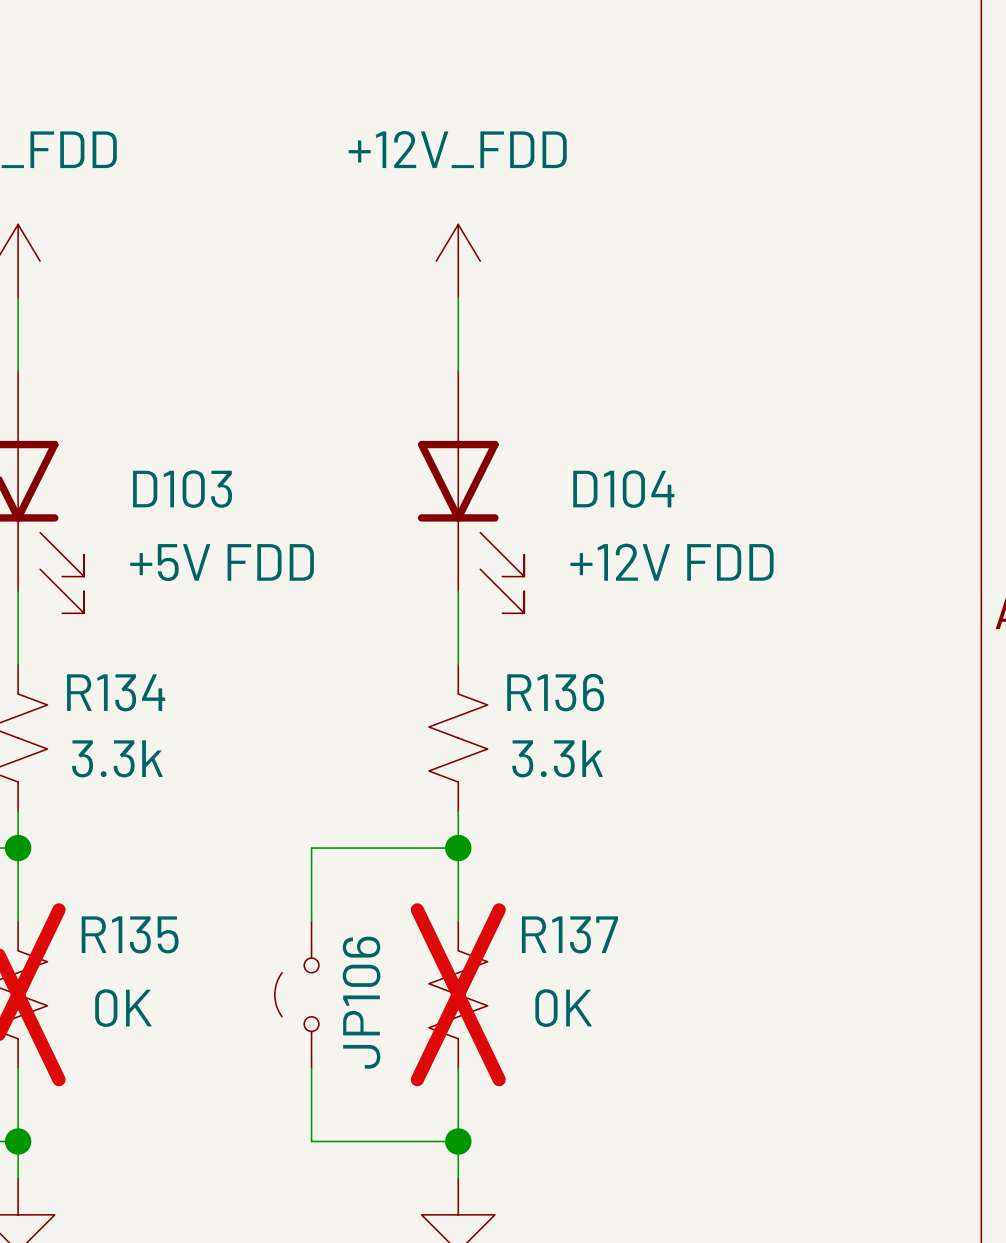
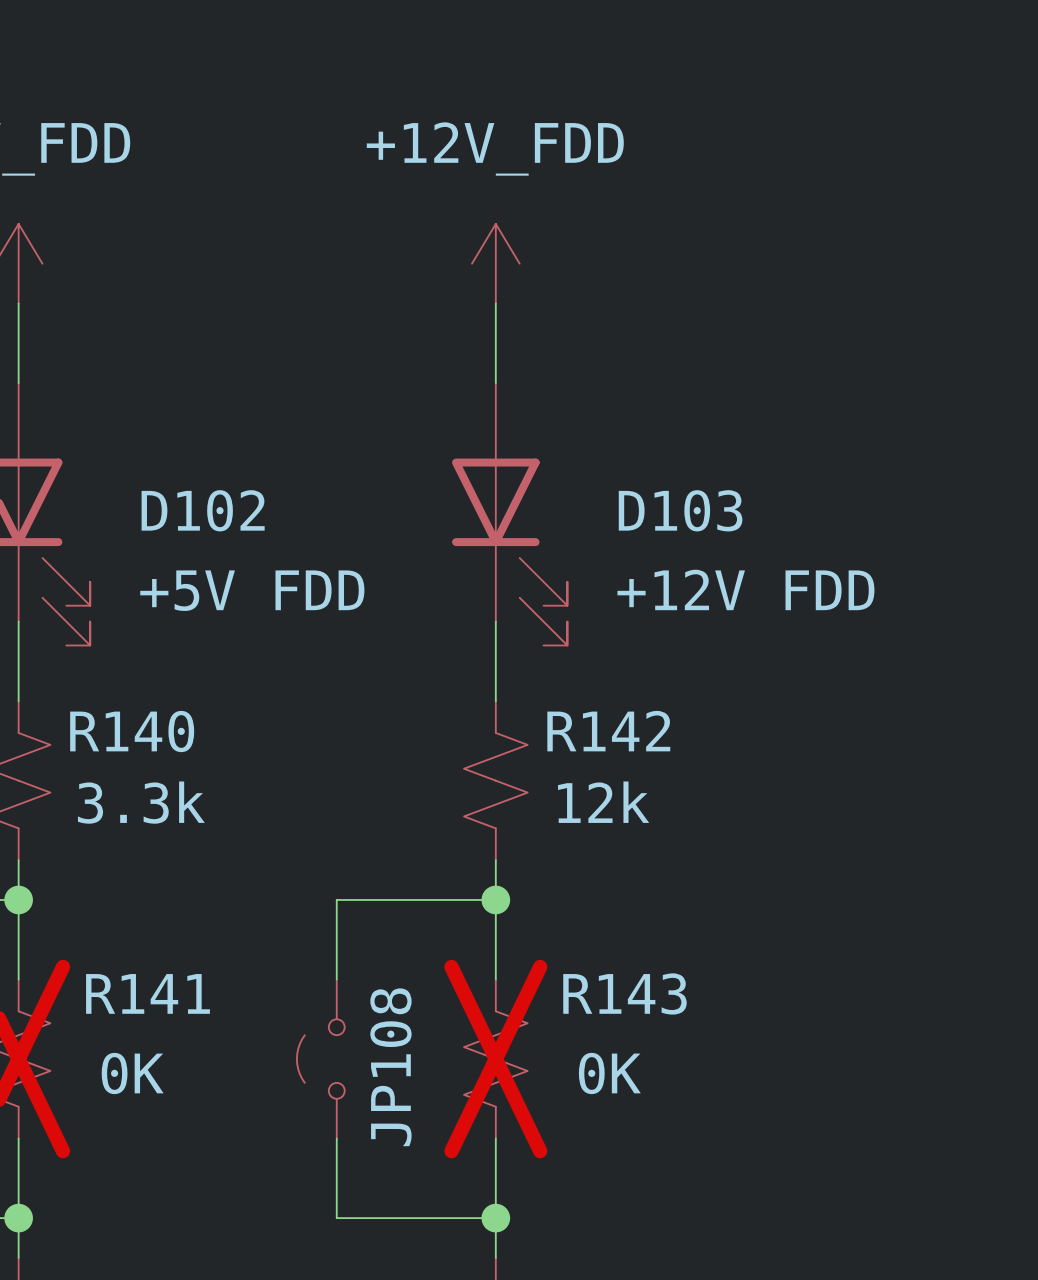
D103 name: D103 (182, 489) -> D102 (203, 510)
D104 name: D104 (623, 489) -> D103 (680, 510)
R134 name: R134 (116, 692) -> R140 (132, 731)
R136 name: R136 (555, 692) -> R142 (608, 731)
R136 value: 3.3k (557, 758) -> 12k (603, 802)
R135 name: R135 (130, 934) -> R141 (147, 993)
R137 name: R137 (569, 934) -> R143 (624, 993)
JP106 name: JP106 (361, 1002) -> JP108 (390, 1067)

